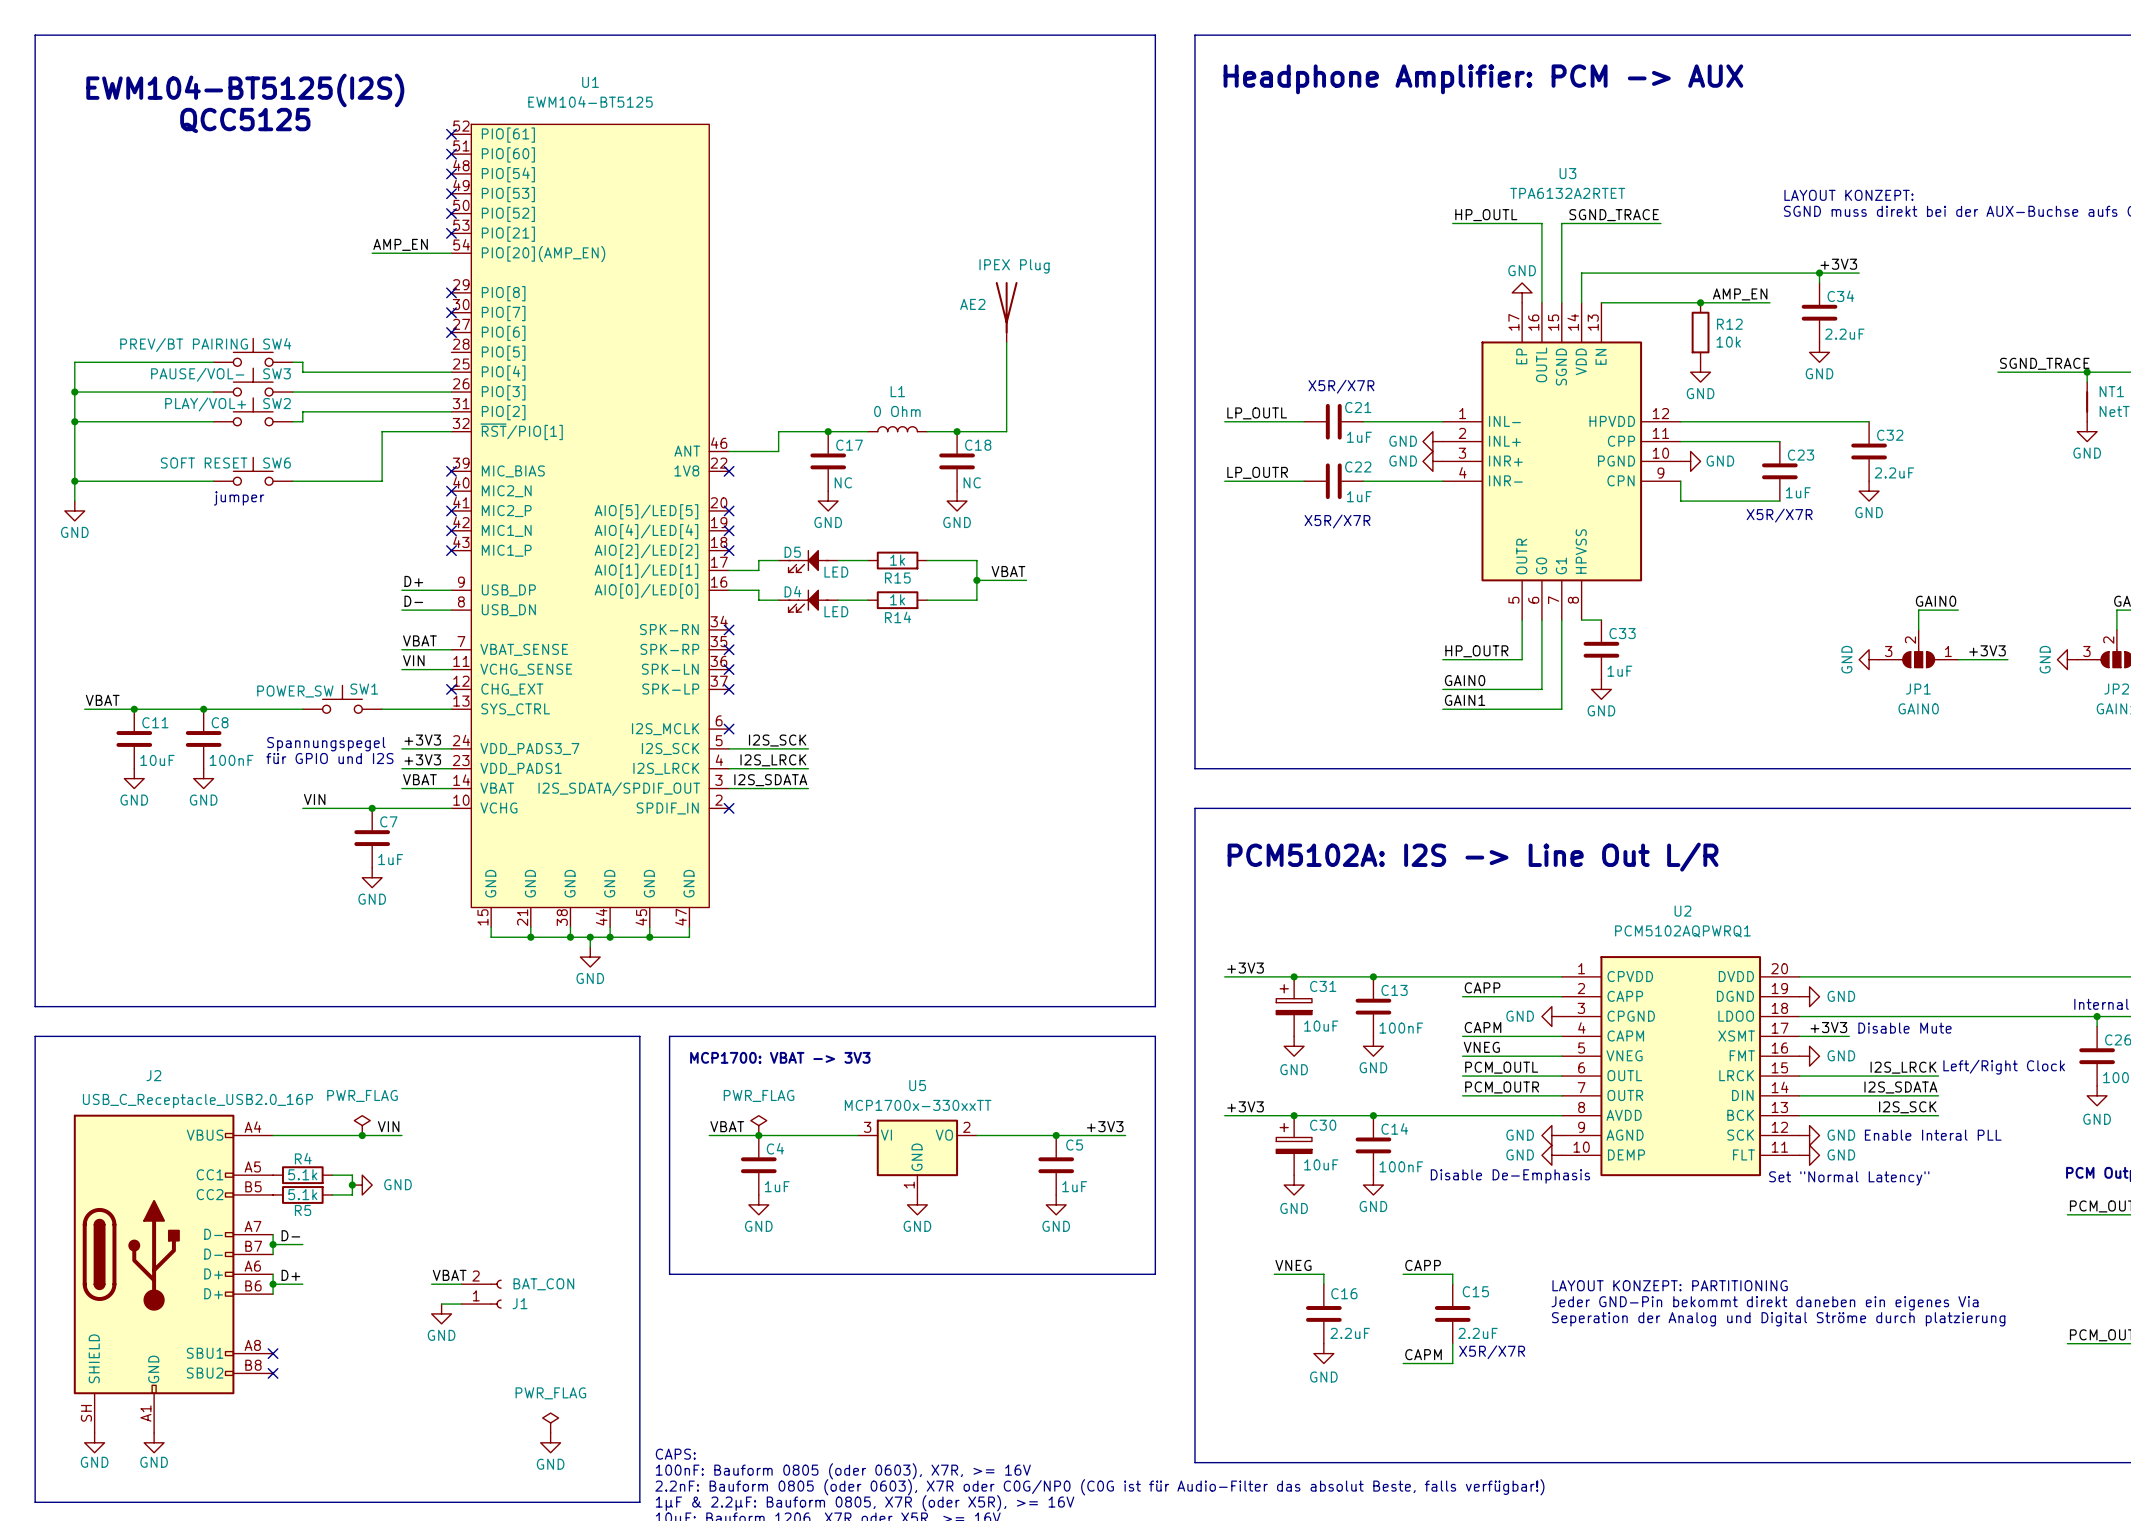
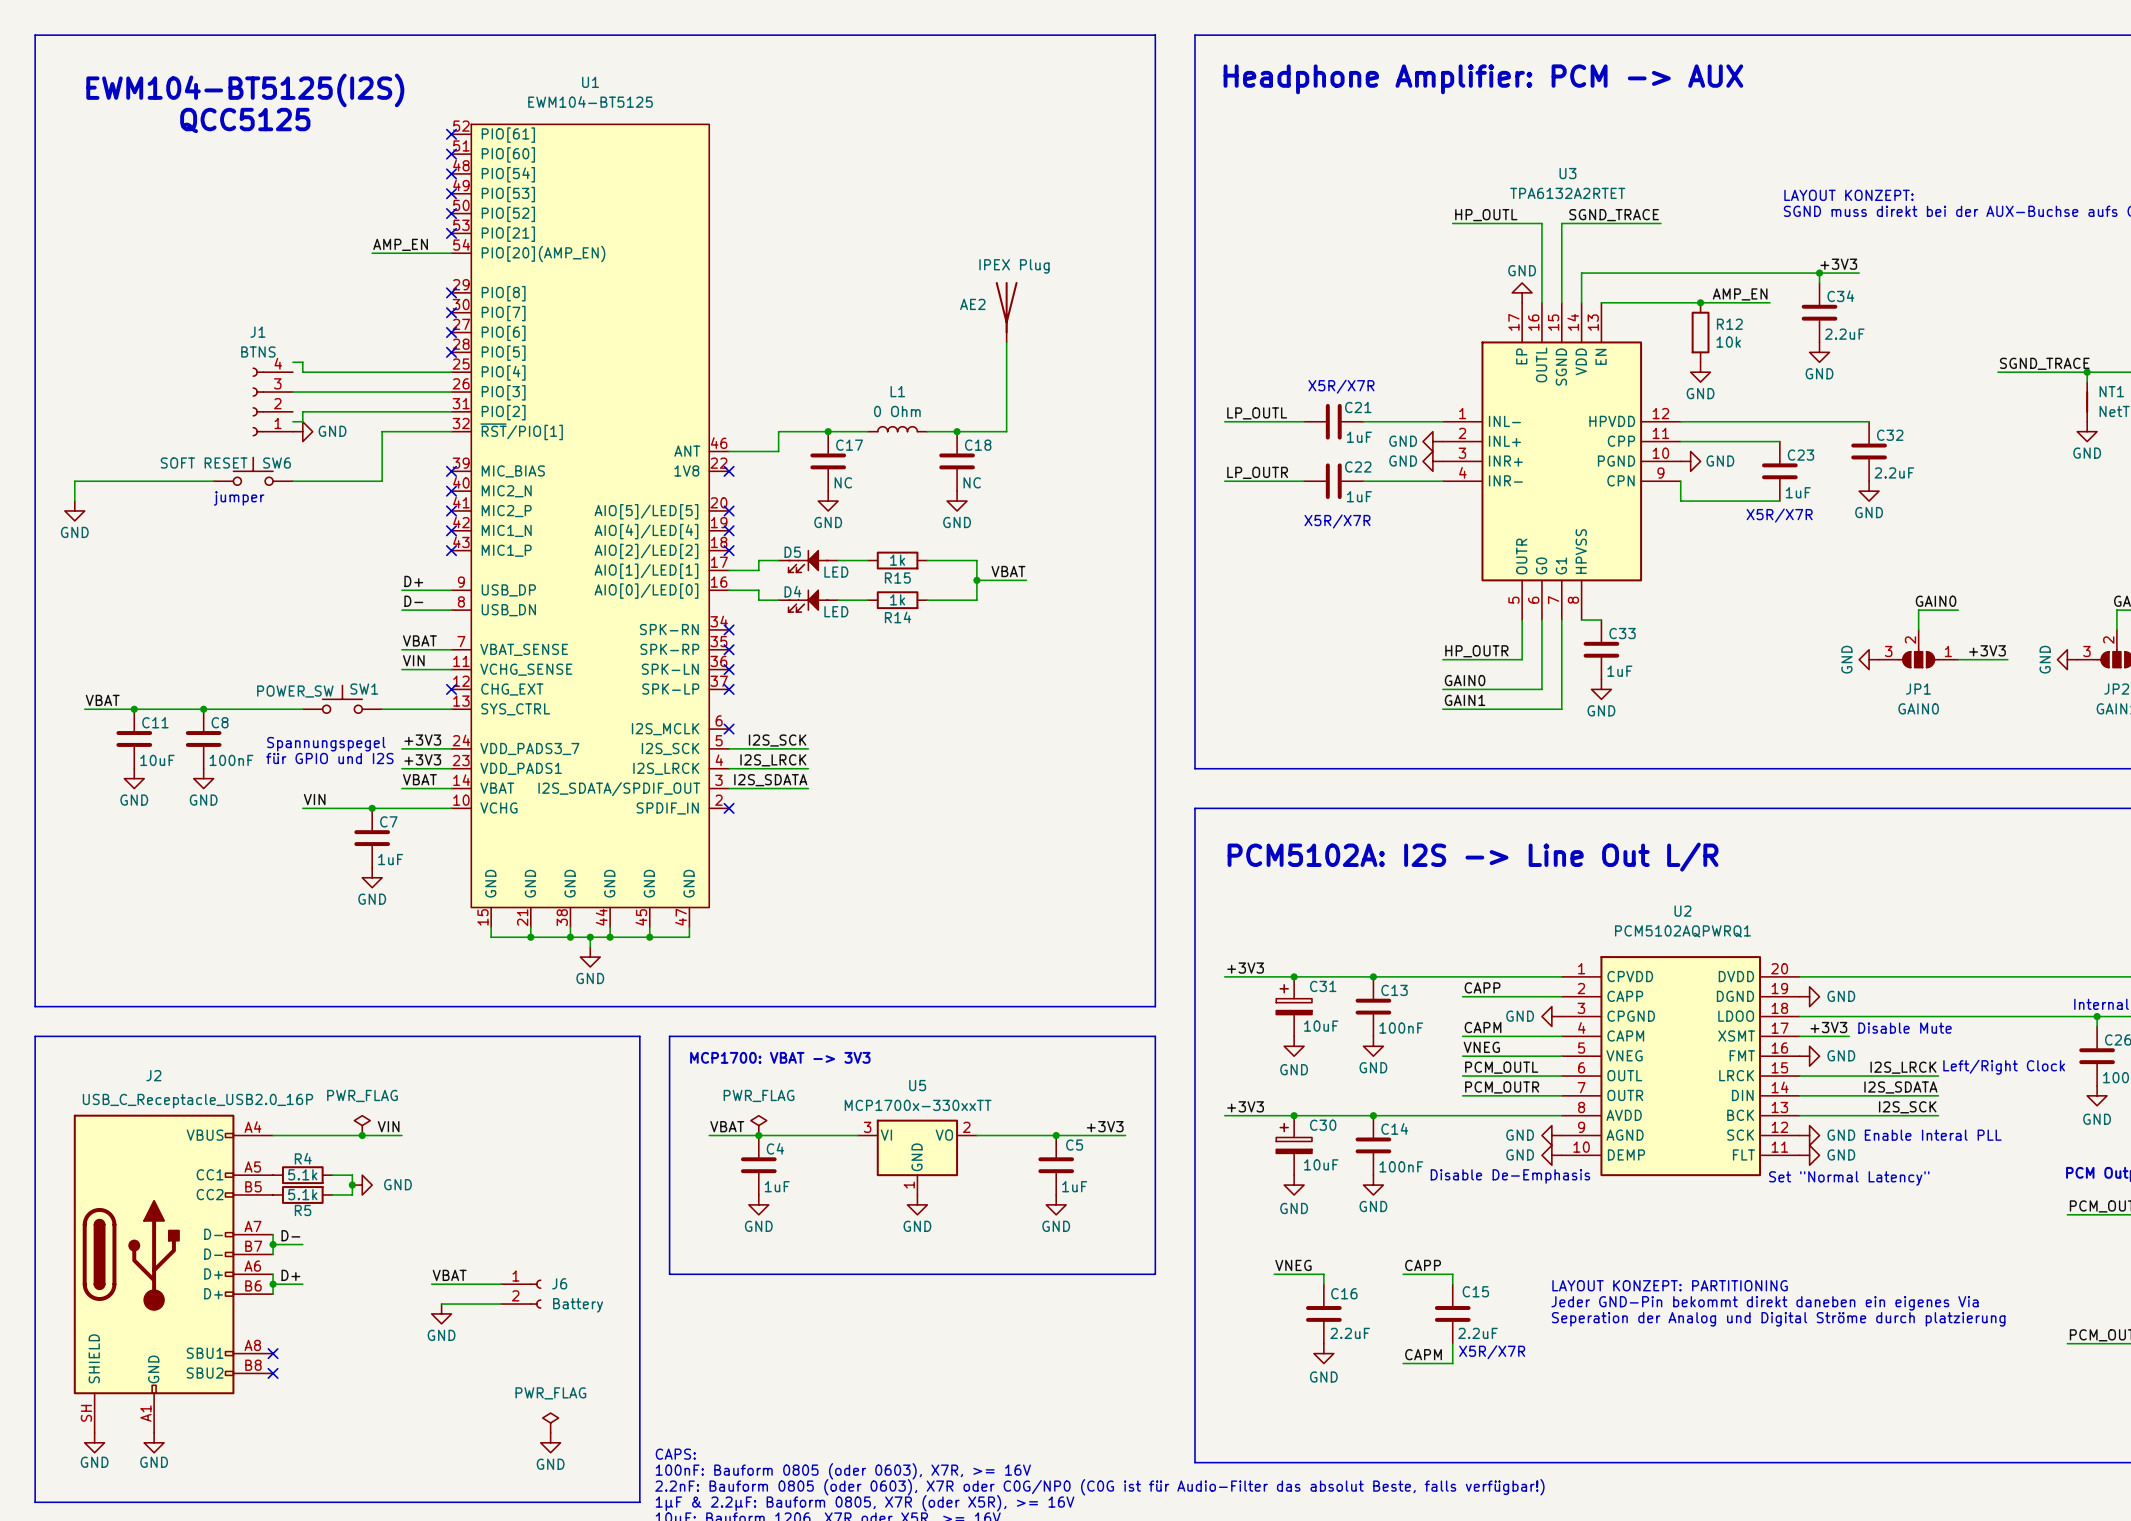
SW4: PREV/BT PAIRING (253, 352) -> none
no-connect mark: none -> (451, 352)
wire: (213, 362) (74, 362) (74, 481) -> none
SW3: PAUSE/VOL- (253, 382) -> none
wire: (74, 392) (213, 392) -> none
junction: (74, 392) -> none
SW2: PLAY/VOL+ (253, 411) -> none
wire: (74, 421) (213, 421) -> none
junction: (74, 421) -> none
power symbol: none -> GND (302, 431)
junction: (74, 481) -> none
J1 symbol: [461, 1279, 502, 1309] -> [252, 367, 293, 437]
J1 value: BAT_CON (543, 1284) -> BTNS (258, 351)
J6: none -> Battery (521, 1294)
J1 name position: J1 (520, 1303) -> J1 (257, 332)

